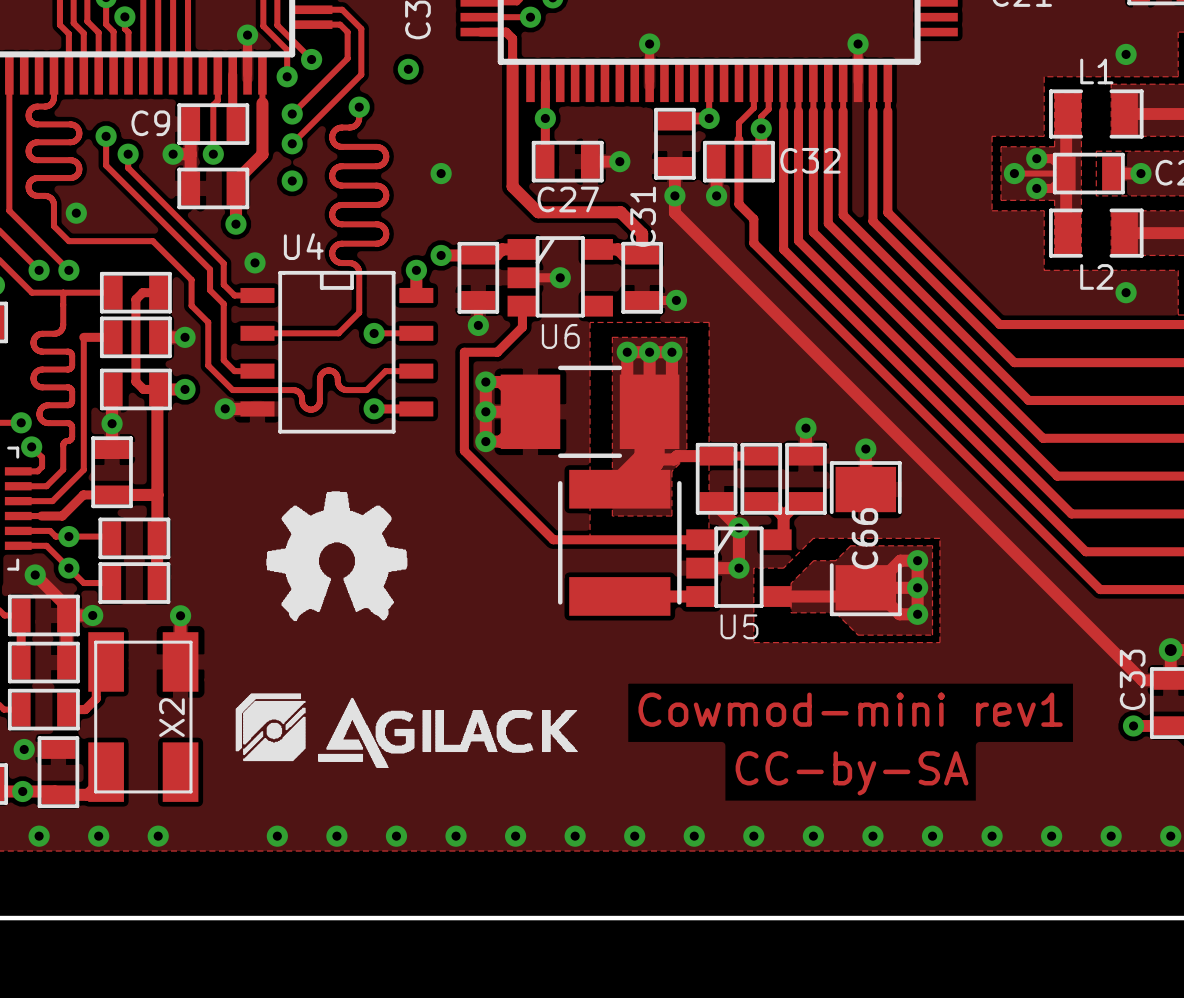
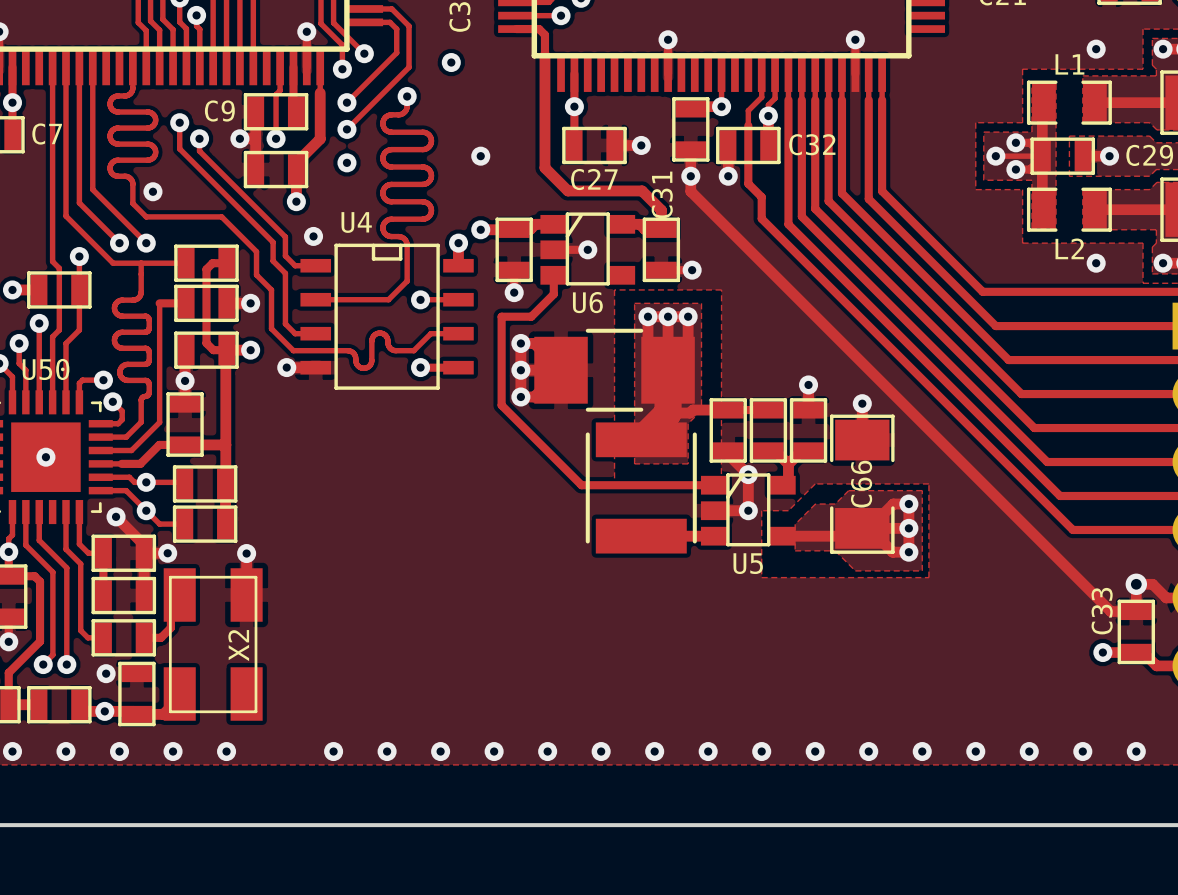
drawing: [266, 491, 408, 621] -> none
drawing: [235, 693, 578, 768] -> none
text: Cowmod-mini rev1 (850, 709) -> none
text: CC-by-SA (852, 773) -> none

